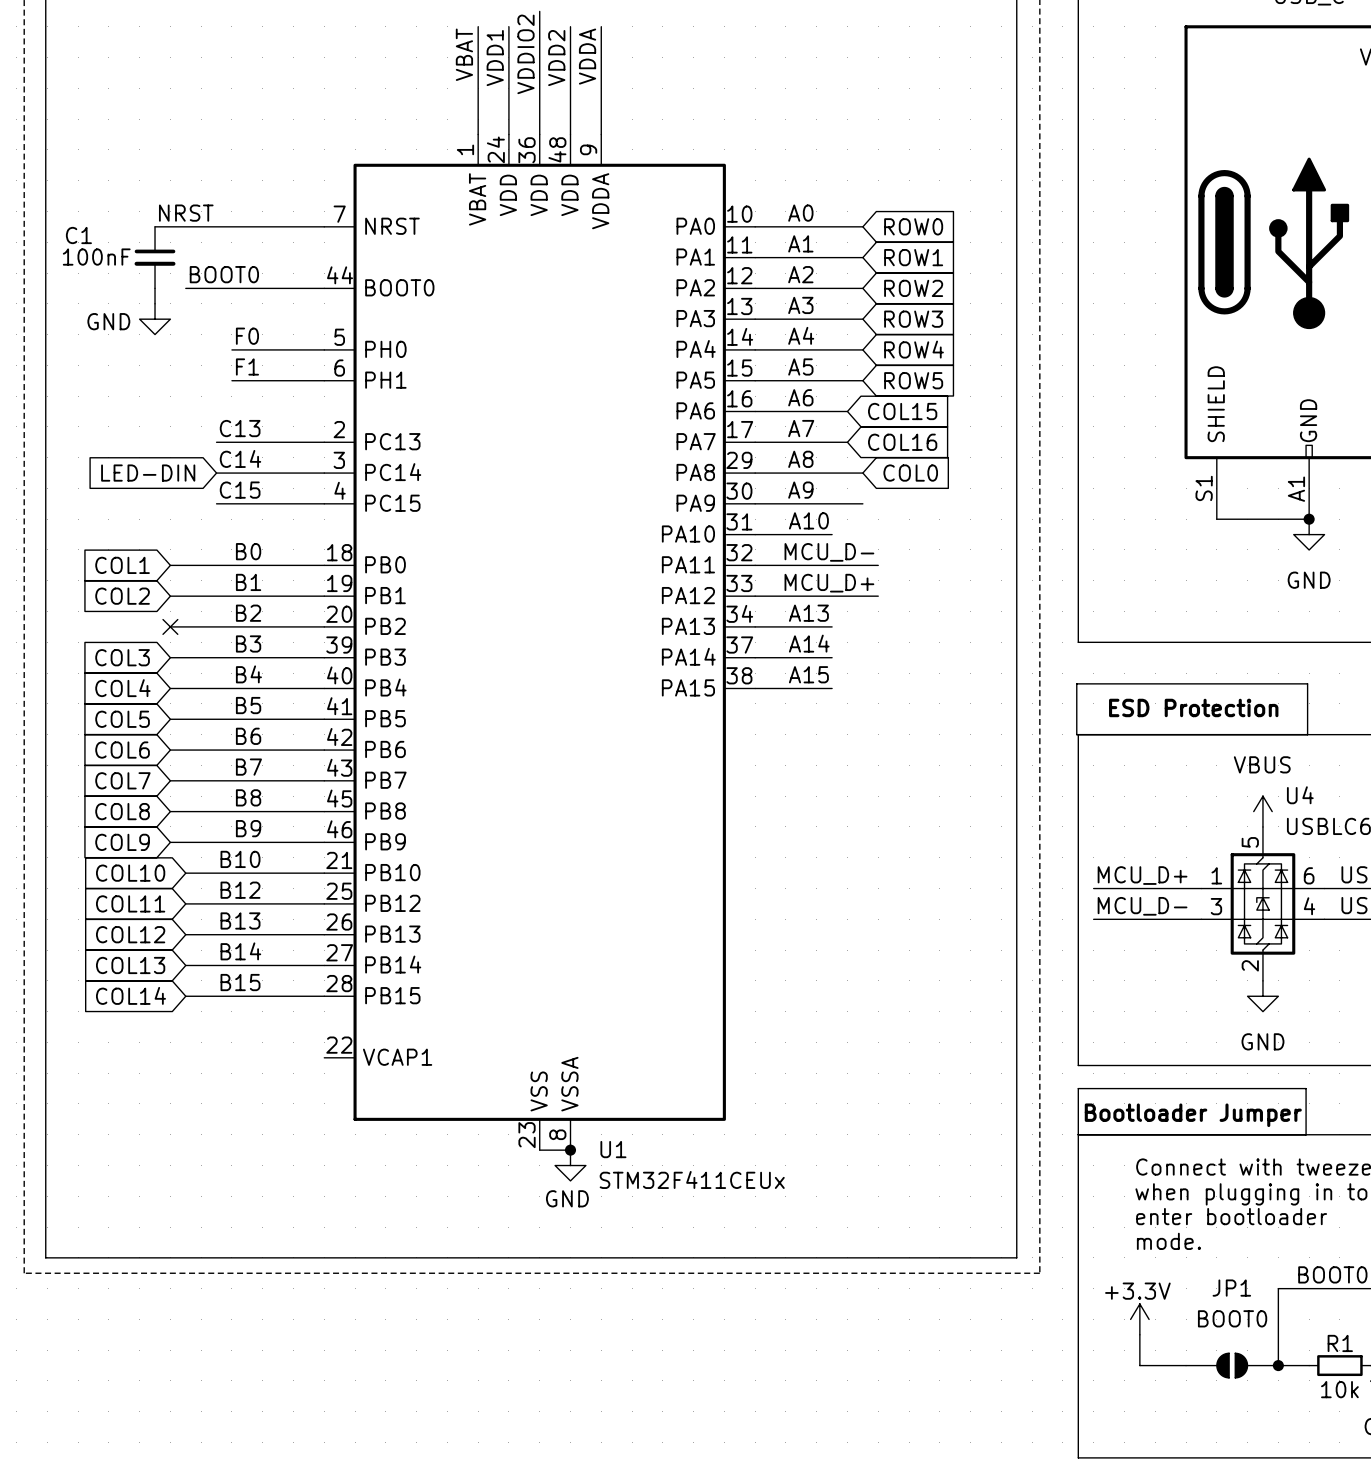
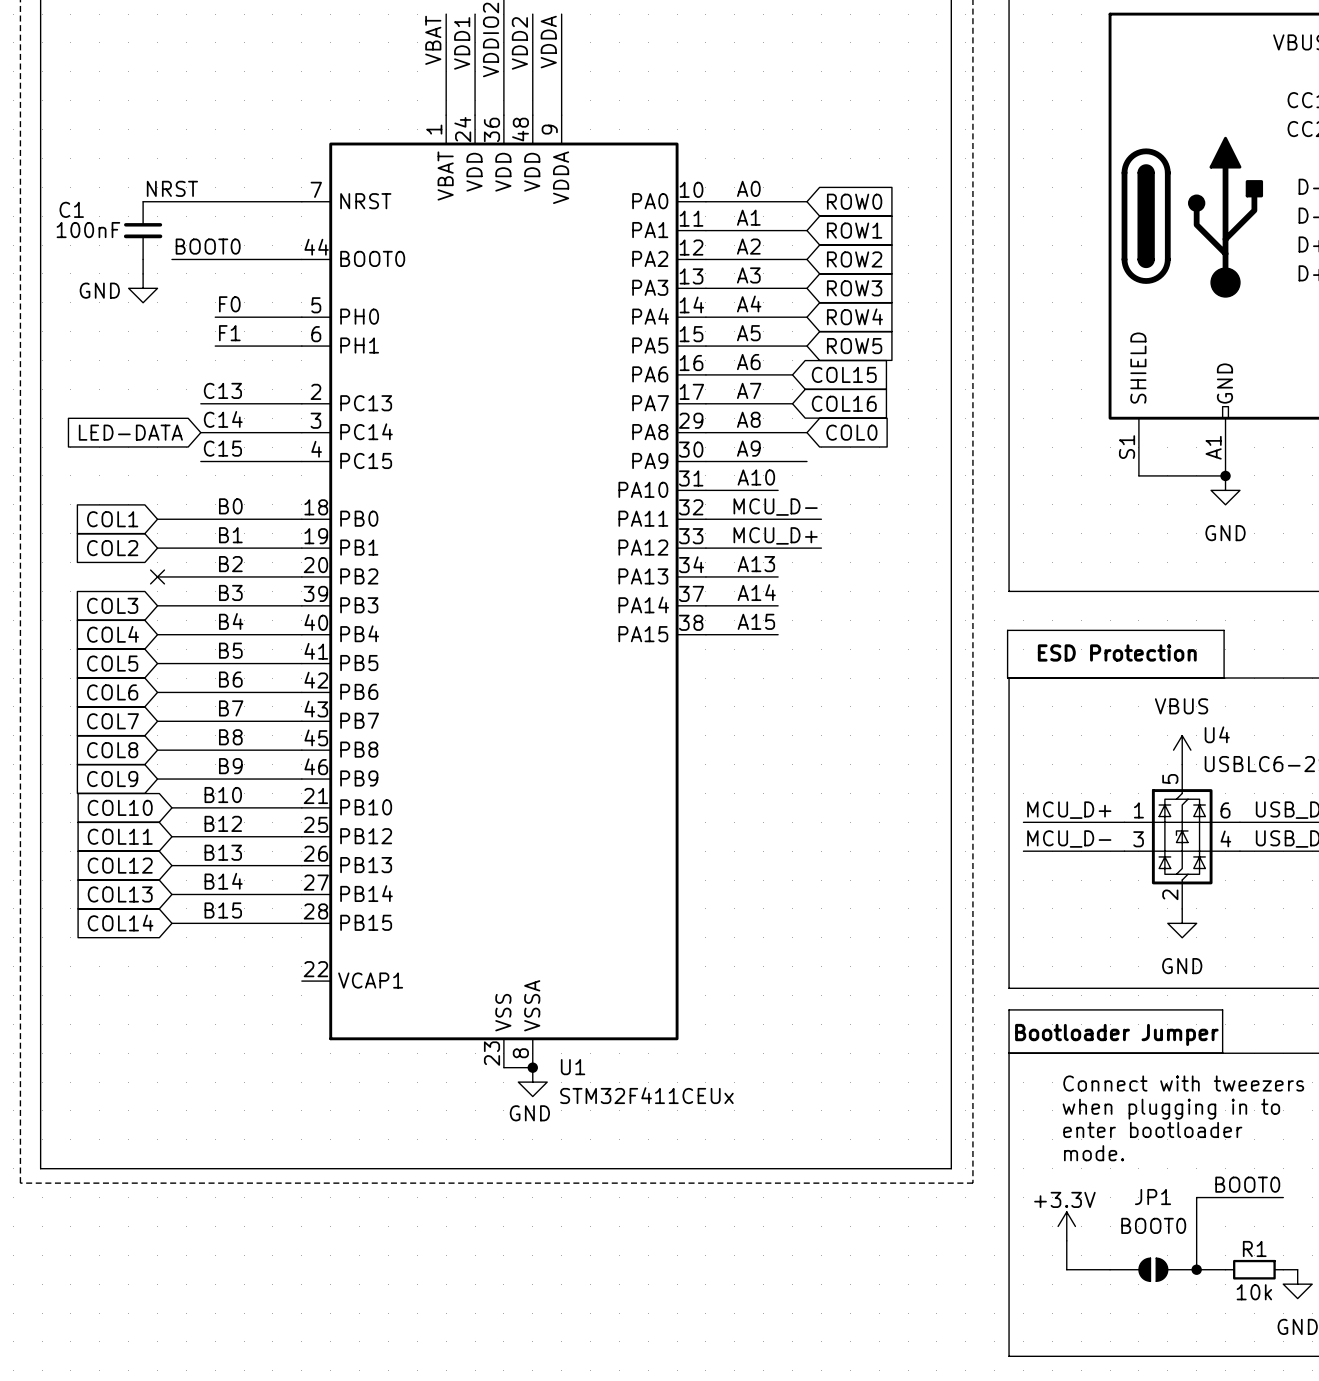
global label: LED-DIN (148, 473) -> LED-DATA (130, 432)

